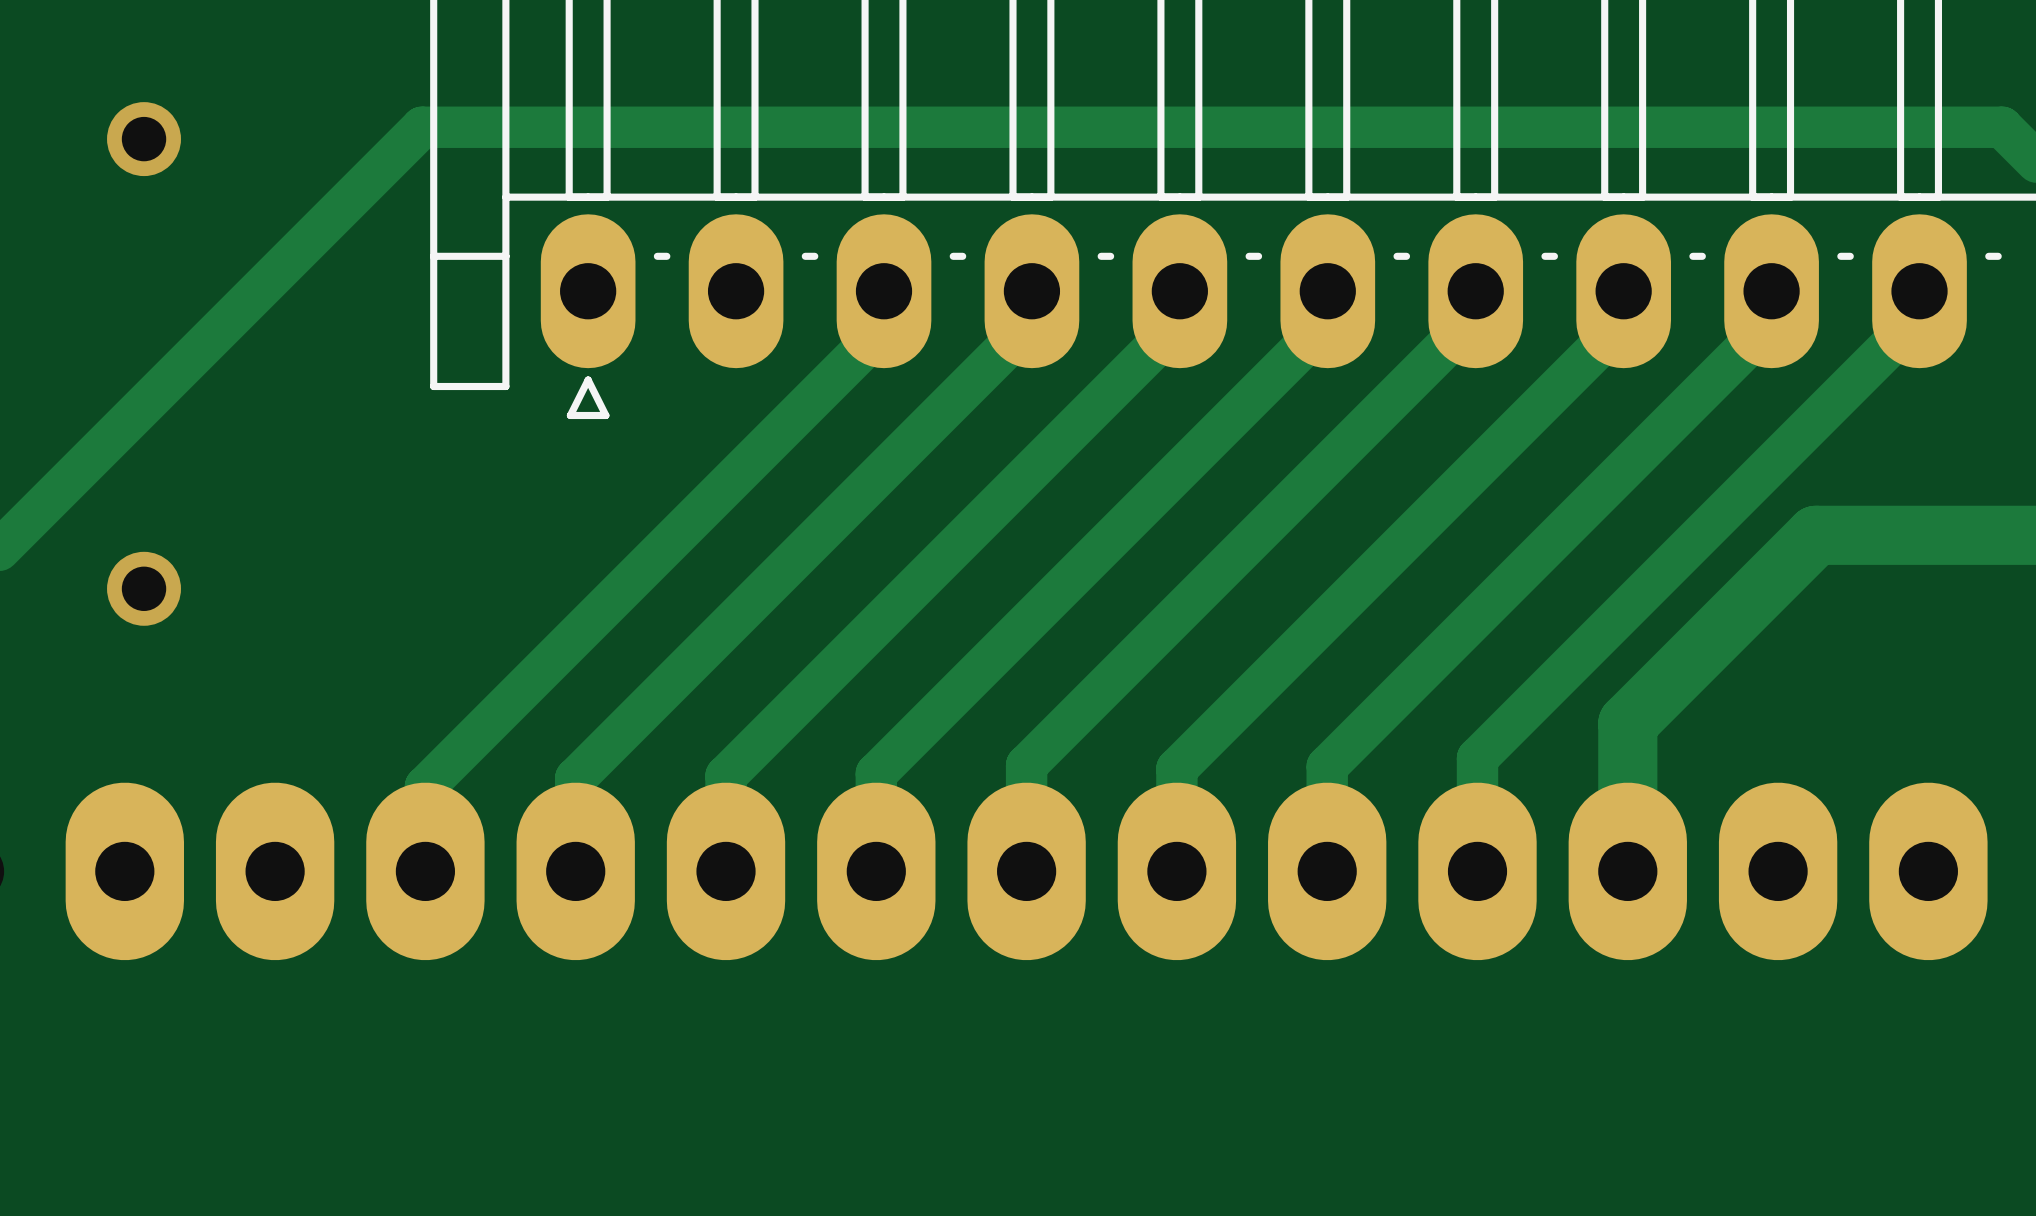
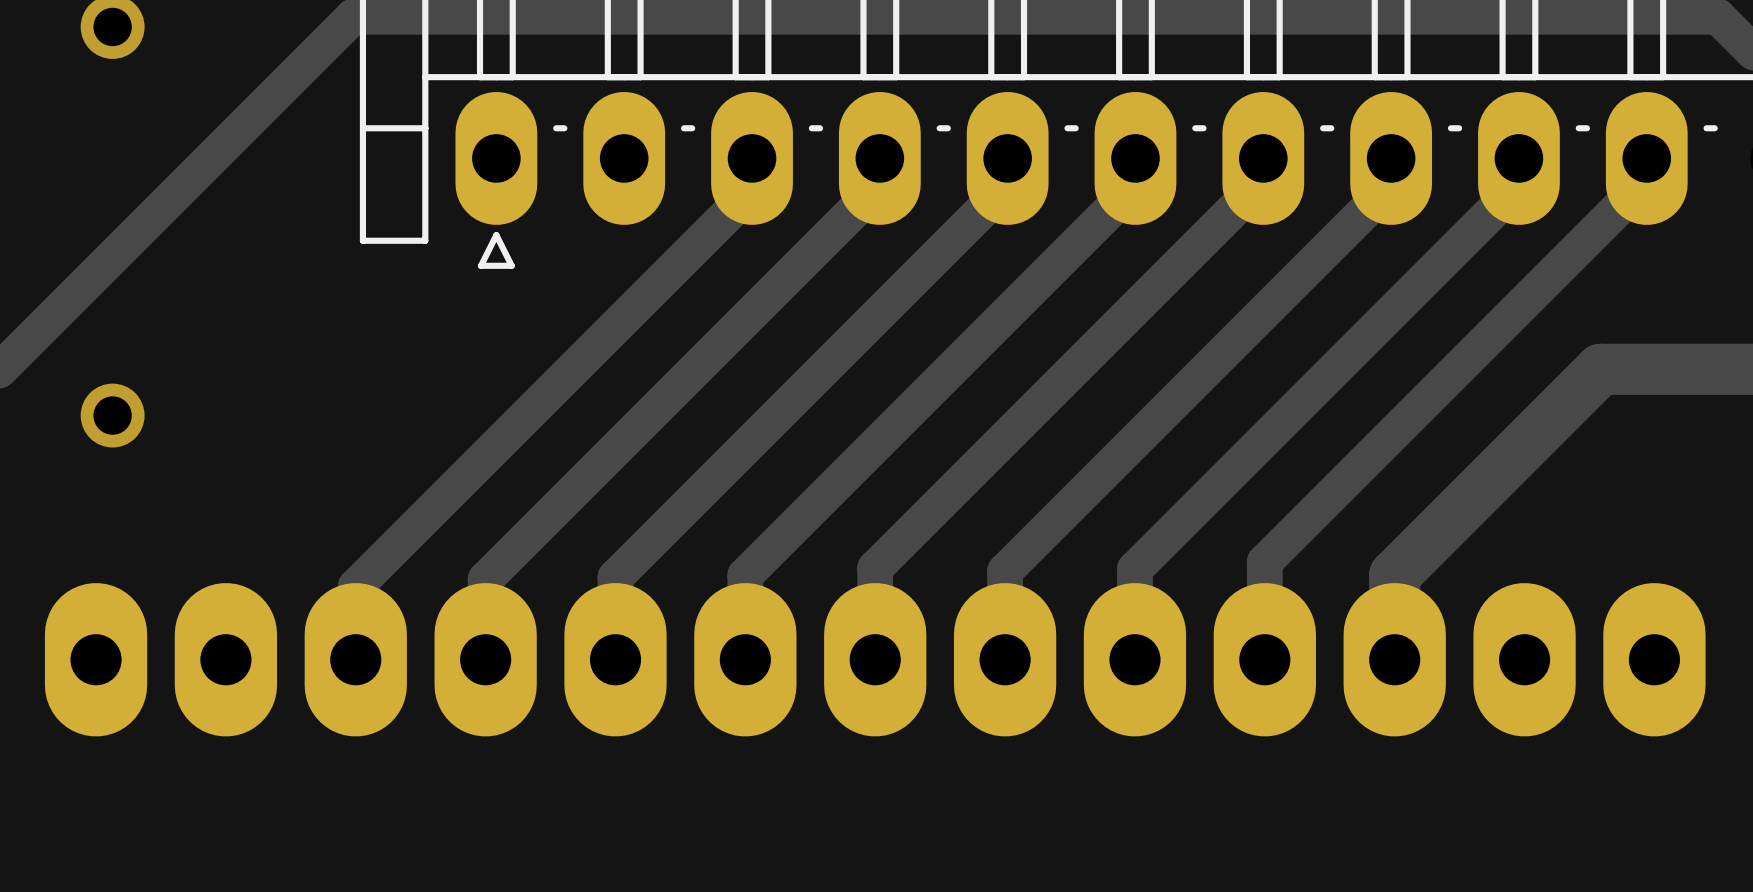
track: (1866, 535) (1815, 535) (1627, 723) (1627, 773) -> (1600, 369) (1394, 575)

